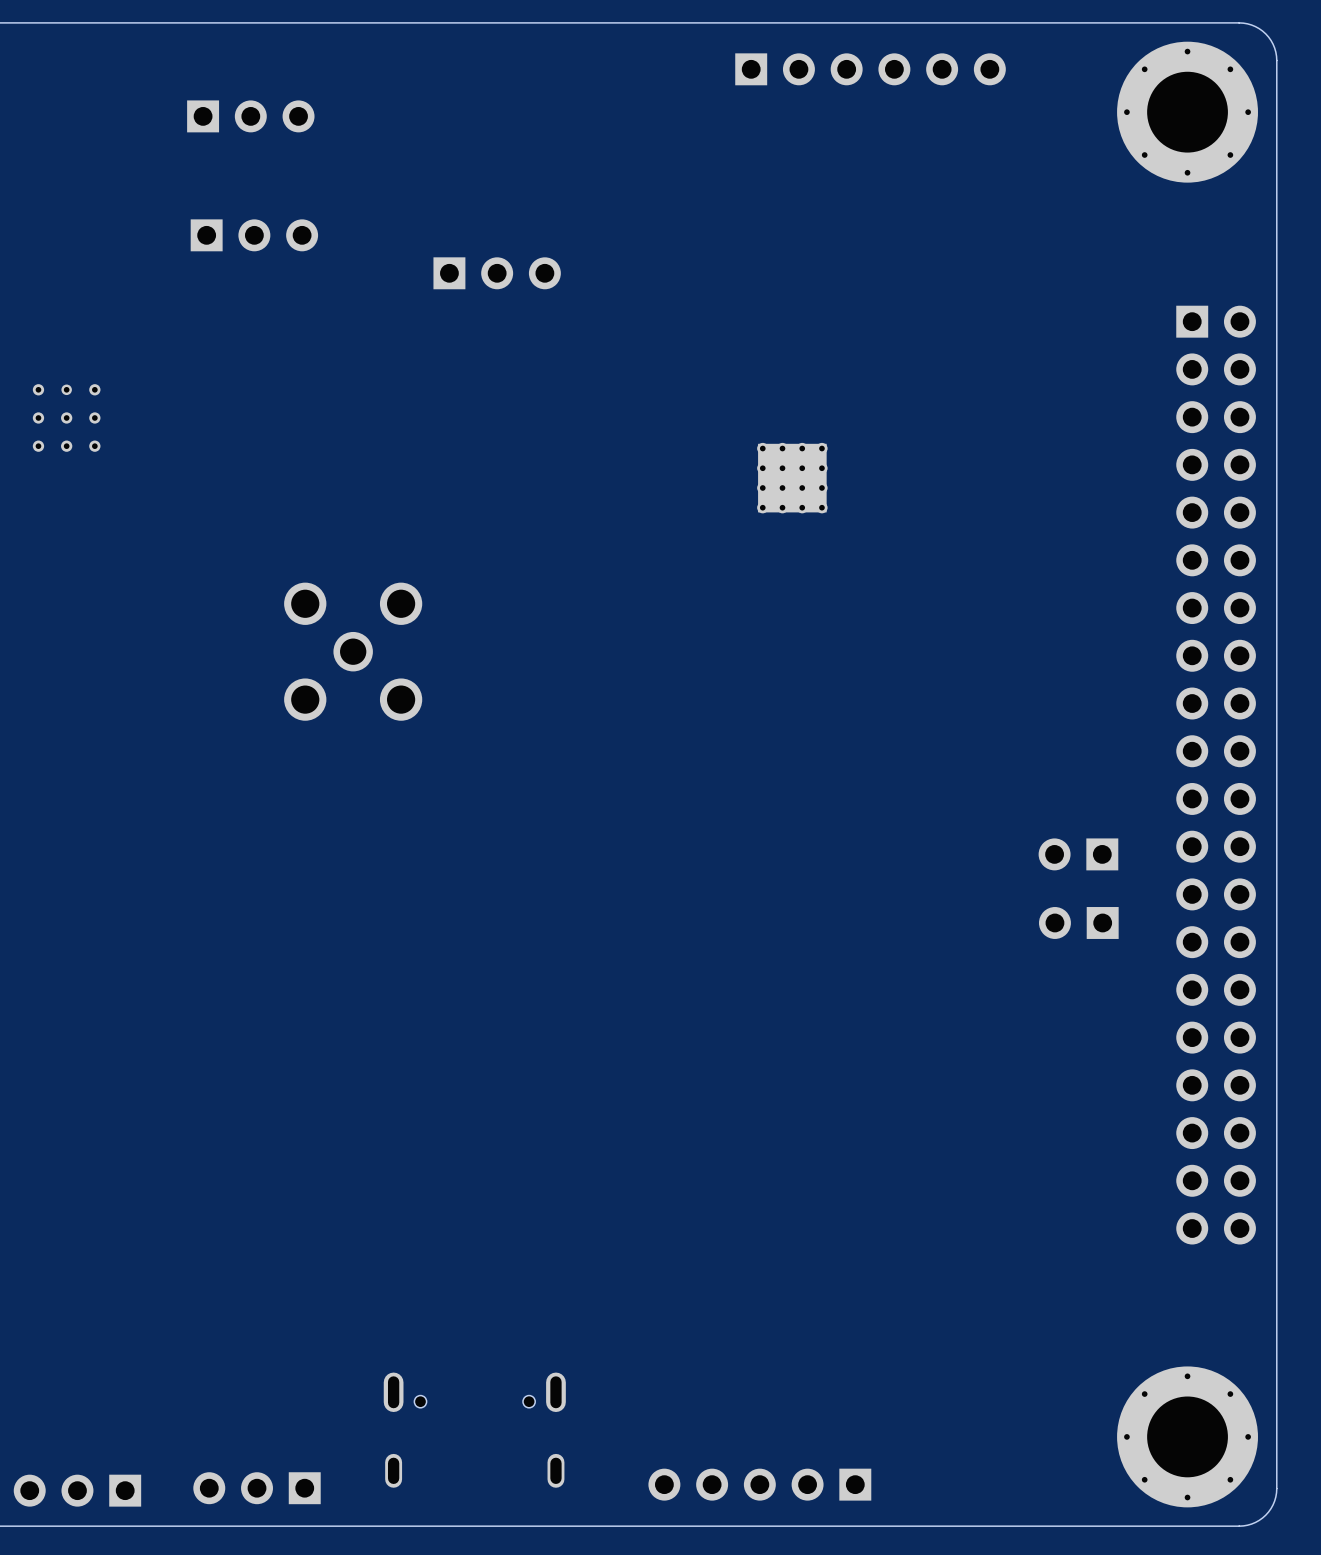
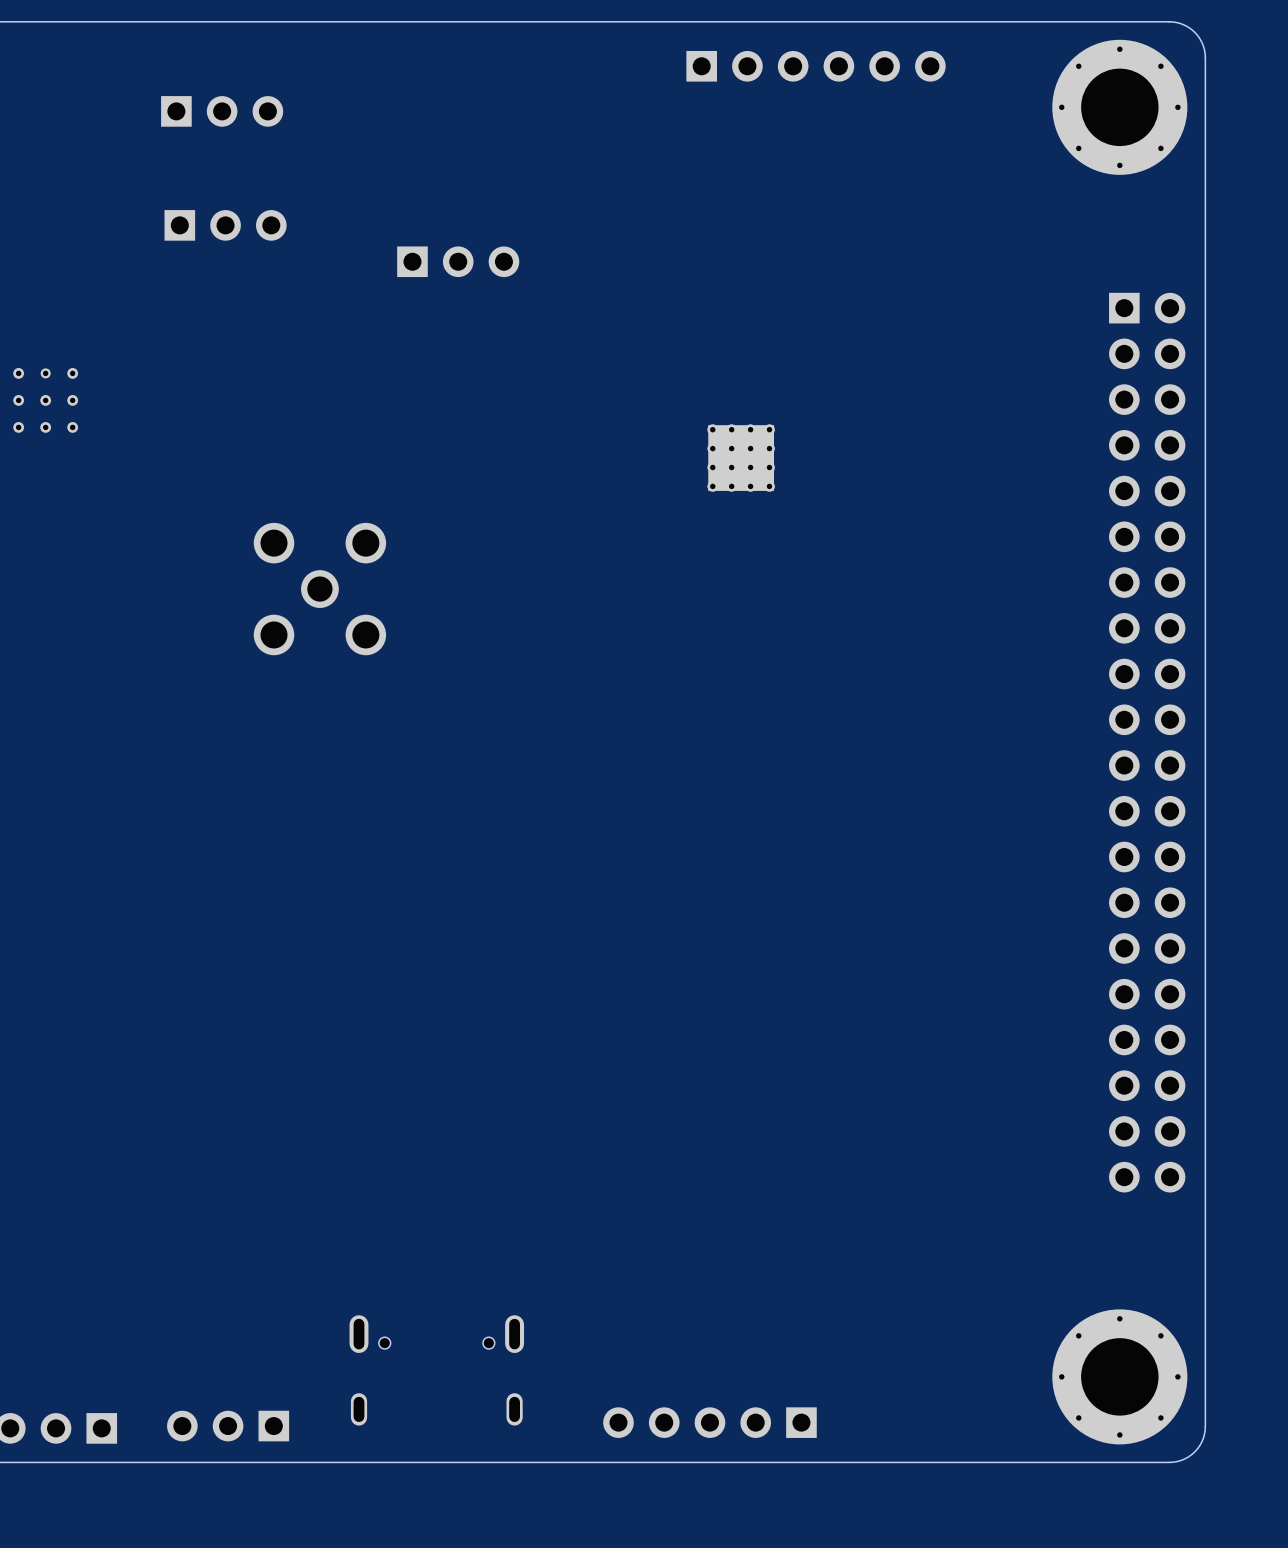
part position: (353, 651) -> (319, 589)
part: (1078, 854) -> none
part: (1078, 922) -> none

